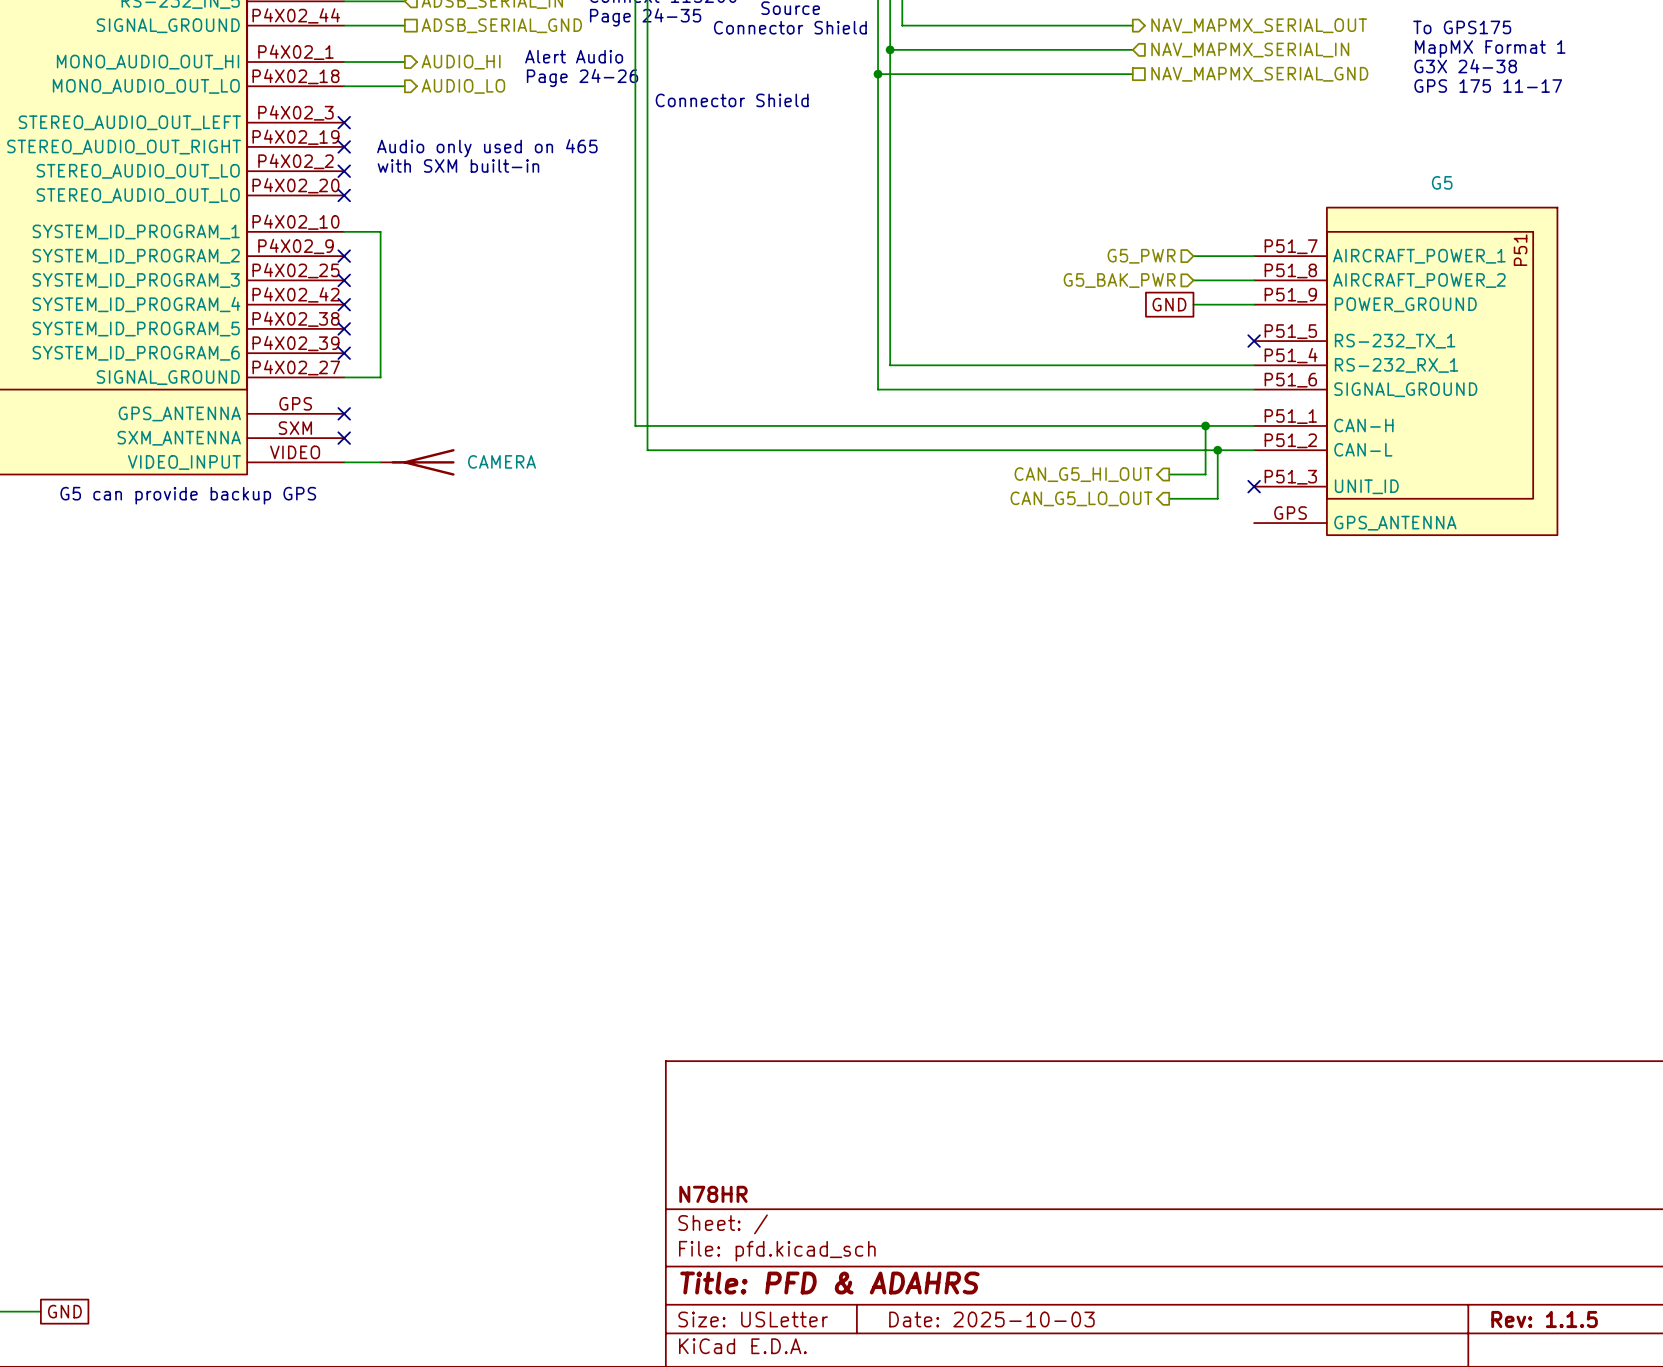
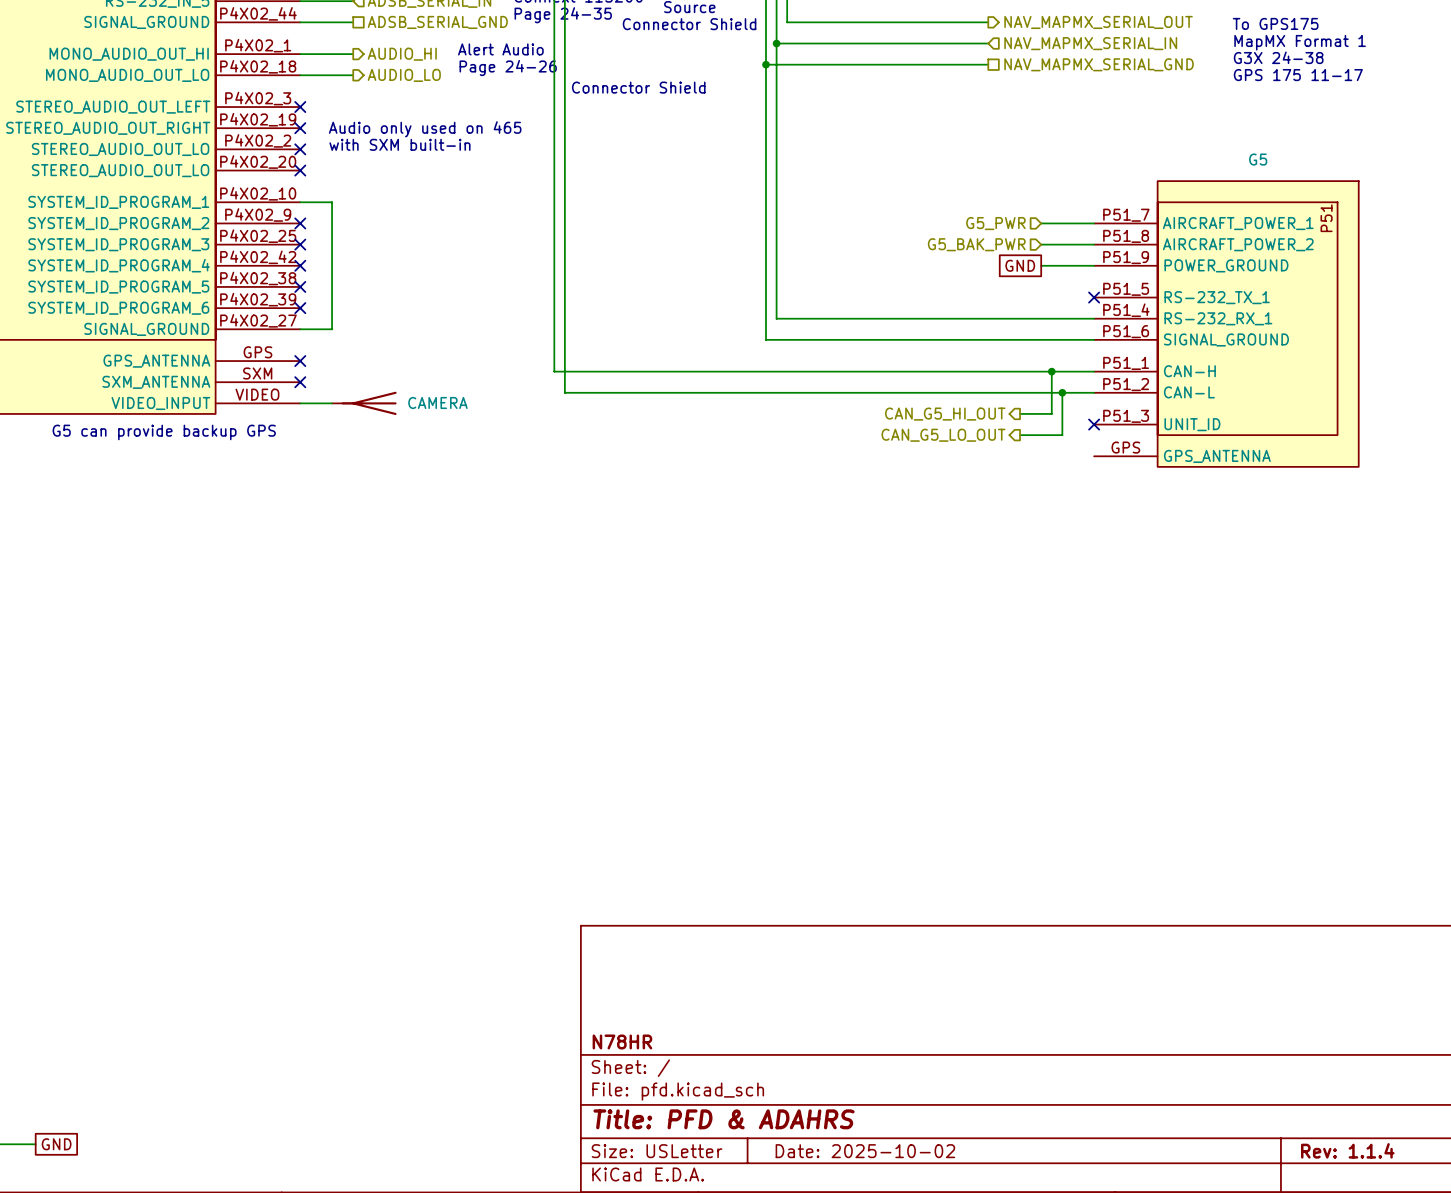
title block: Date: 2025-10-03 (991, 1319) -> Date: 2025-10-02 (865, 1151)
title block: Rev: 1.1.5 (1544, 1319) -> Rev: 1.1.4 (1347, 1150)

